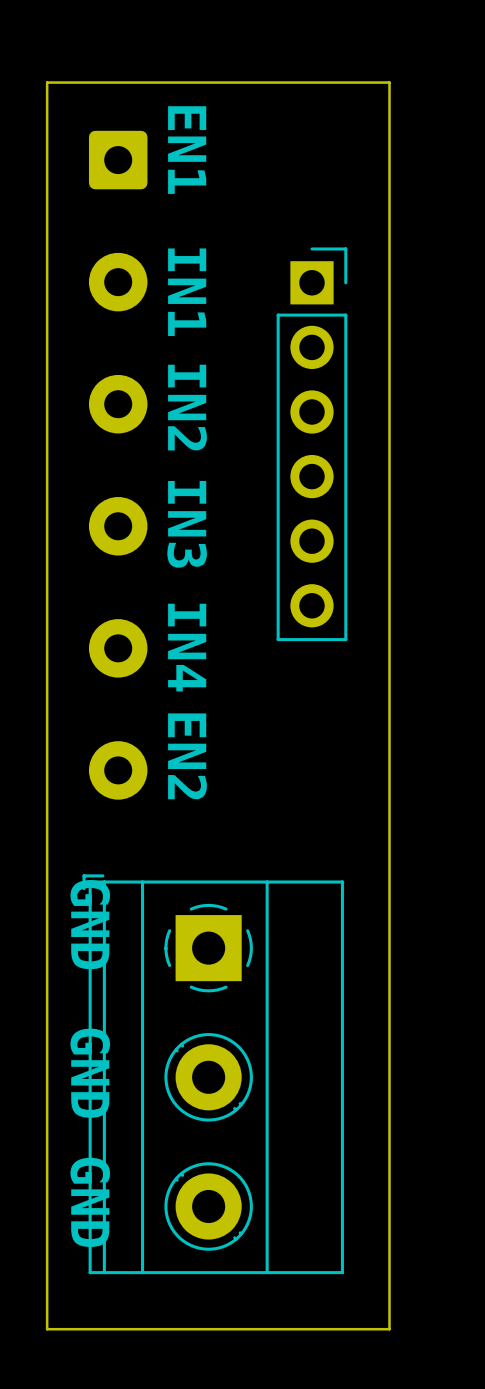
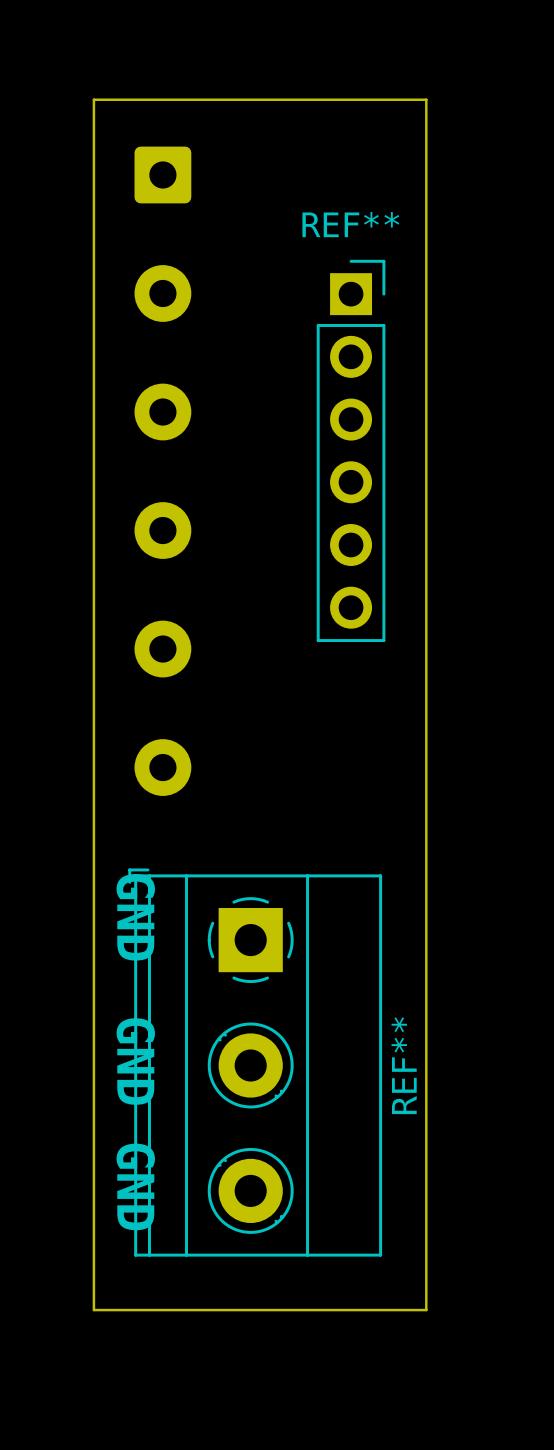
text: EN1 (187, 150) -> none
REF** name: none -> REF** (350, 224)
text: IN1 (187, 292) -> none
text: IN2 (187, 407) -> none
text: IN3 (187, 524) -> none
text: IN4 (187, 647) -> none
text: EN2 (187, 756) -> none
REF** name: none -> REF** (404, 1065)

